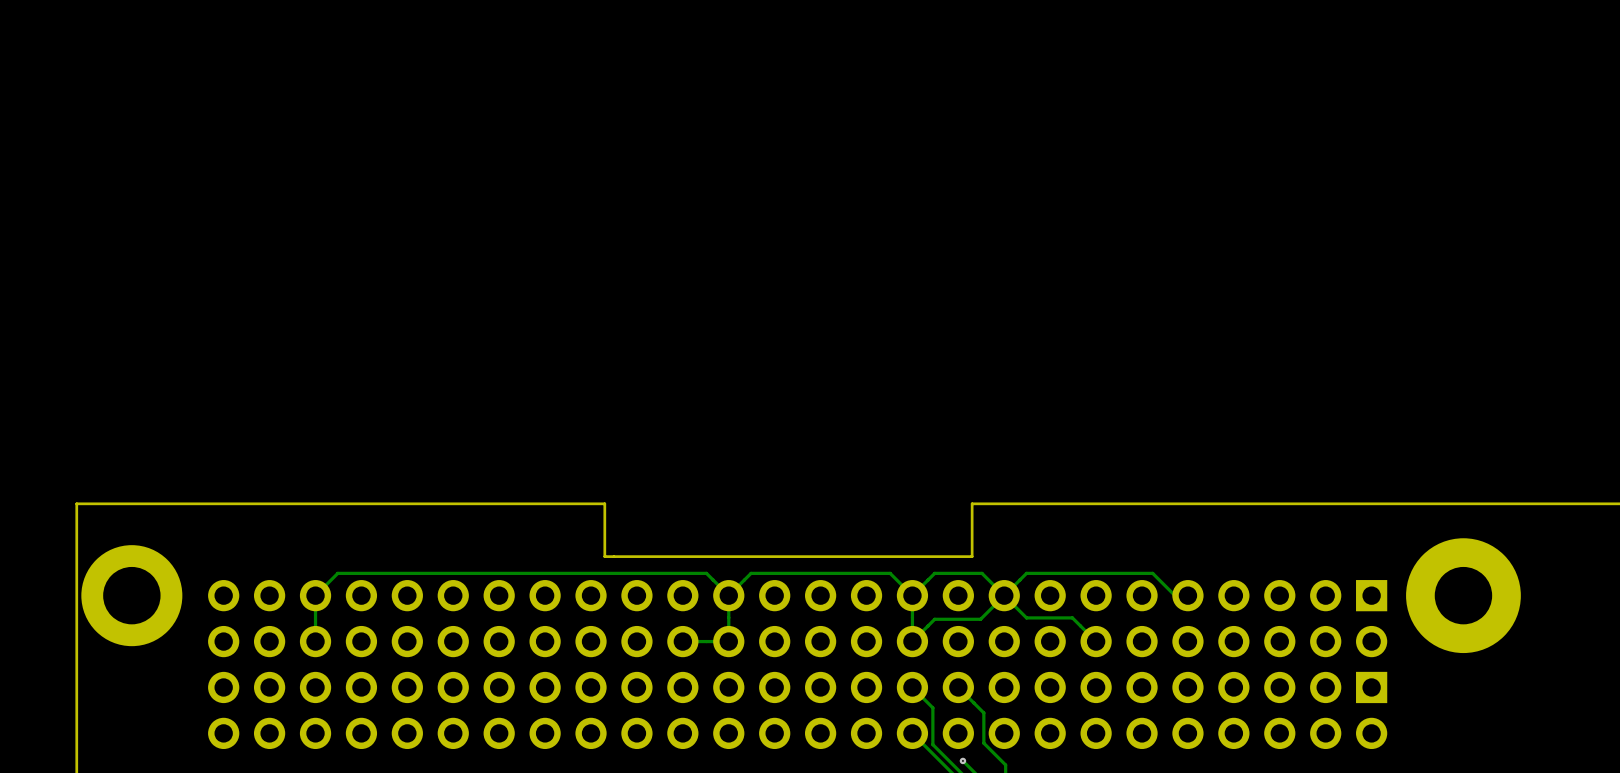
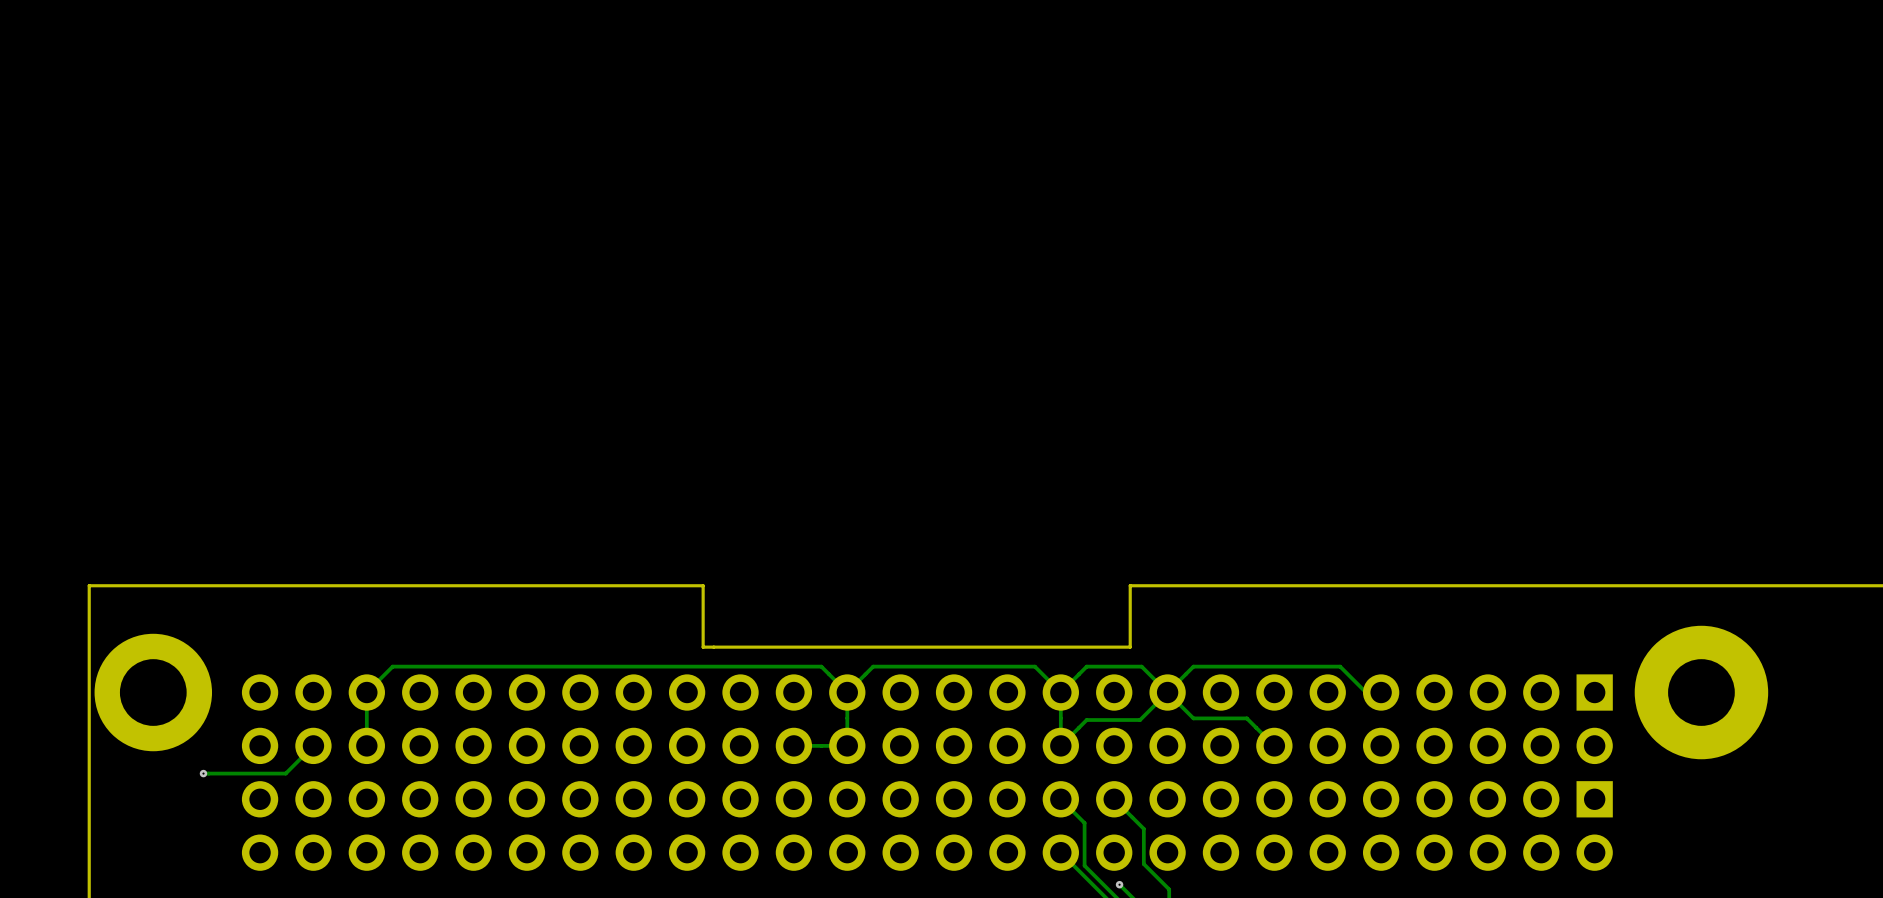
track: none -> (313, 745) (285, 773) (203, 773)
via: none -> (203, 773)

